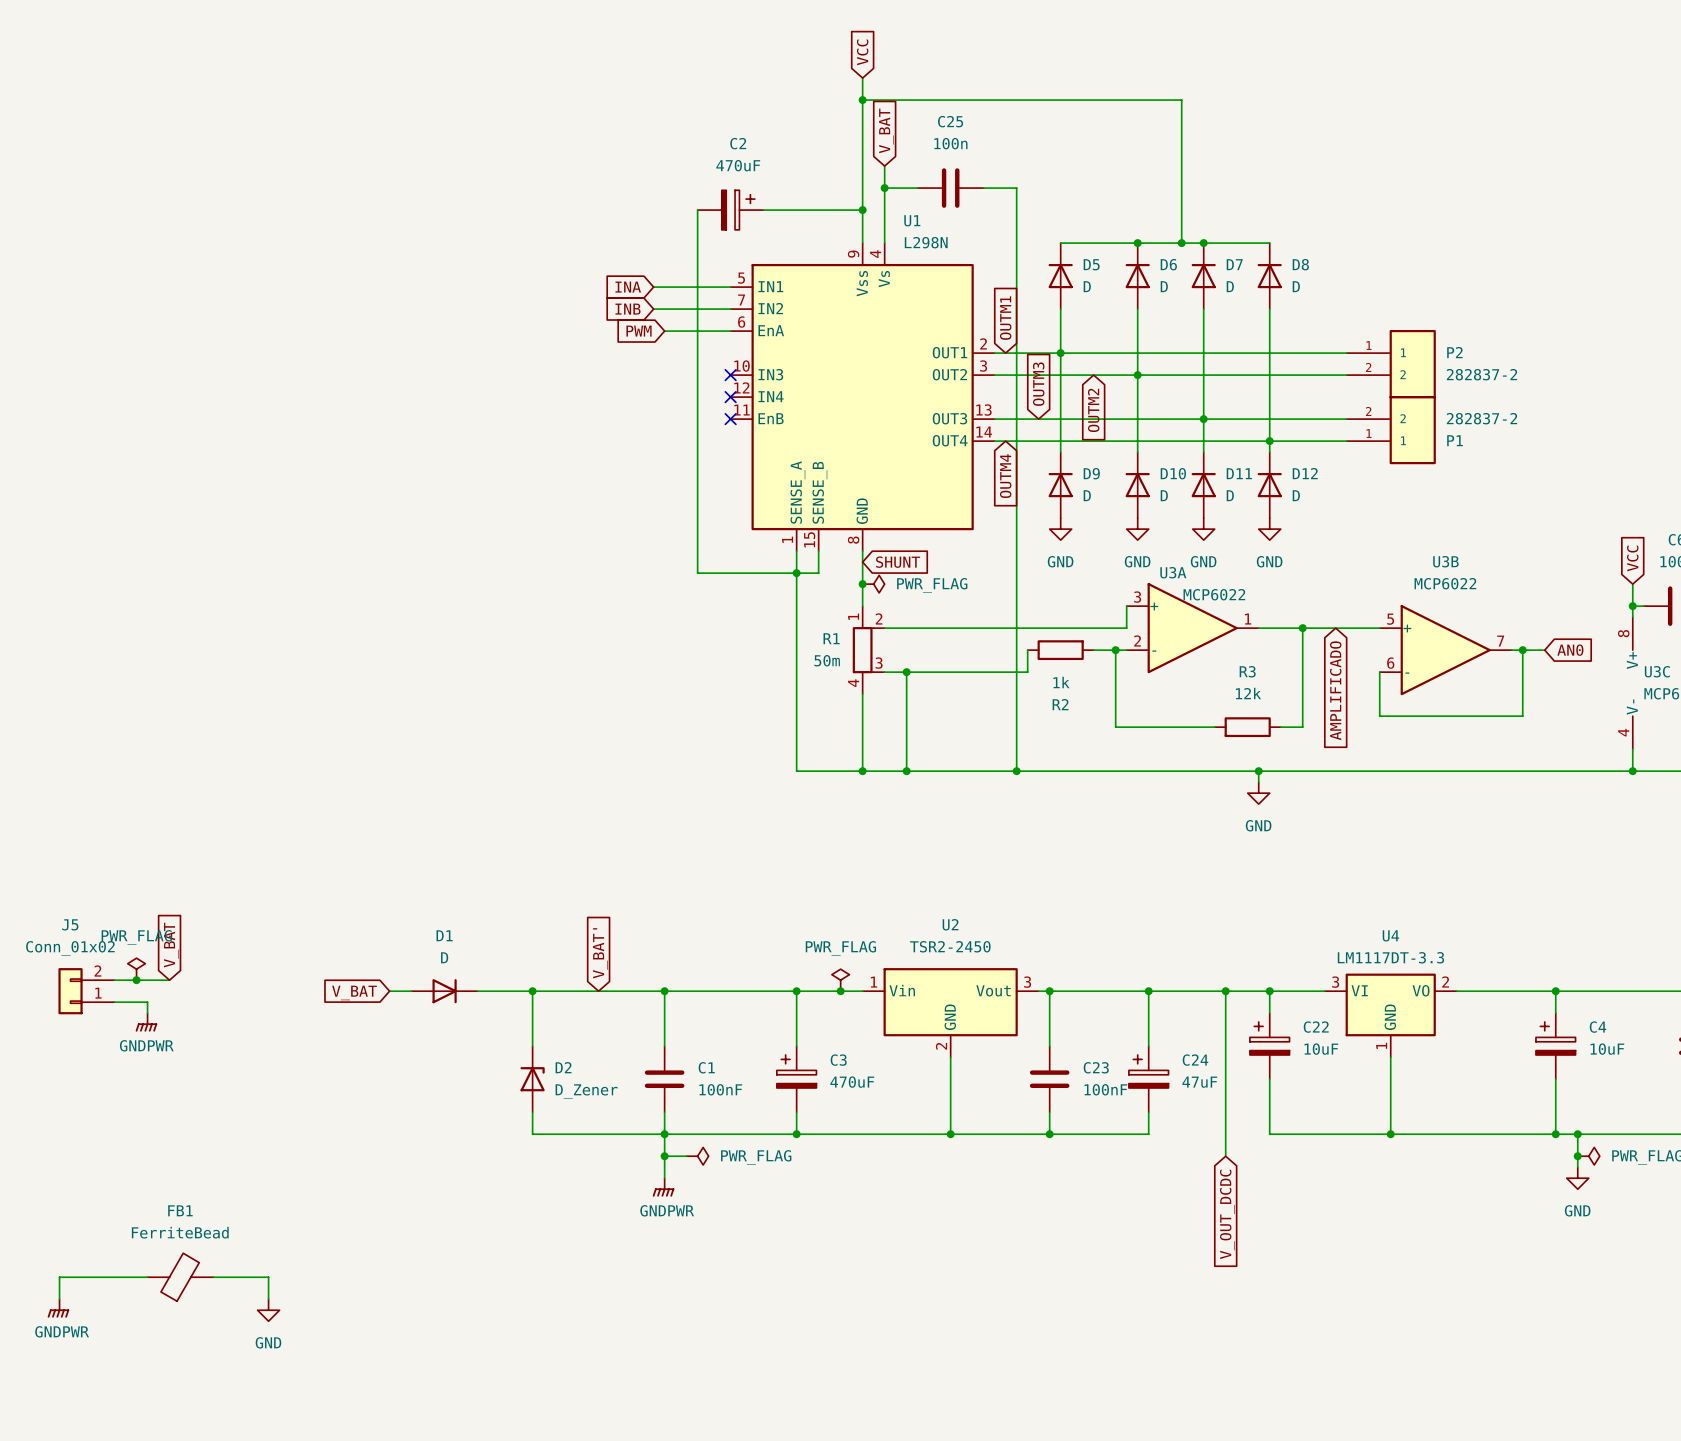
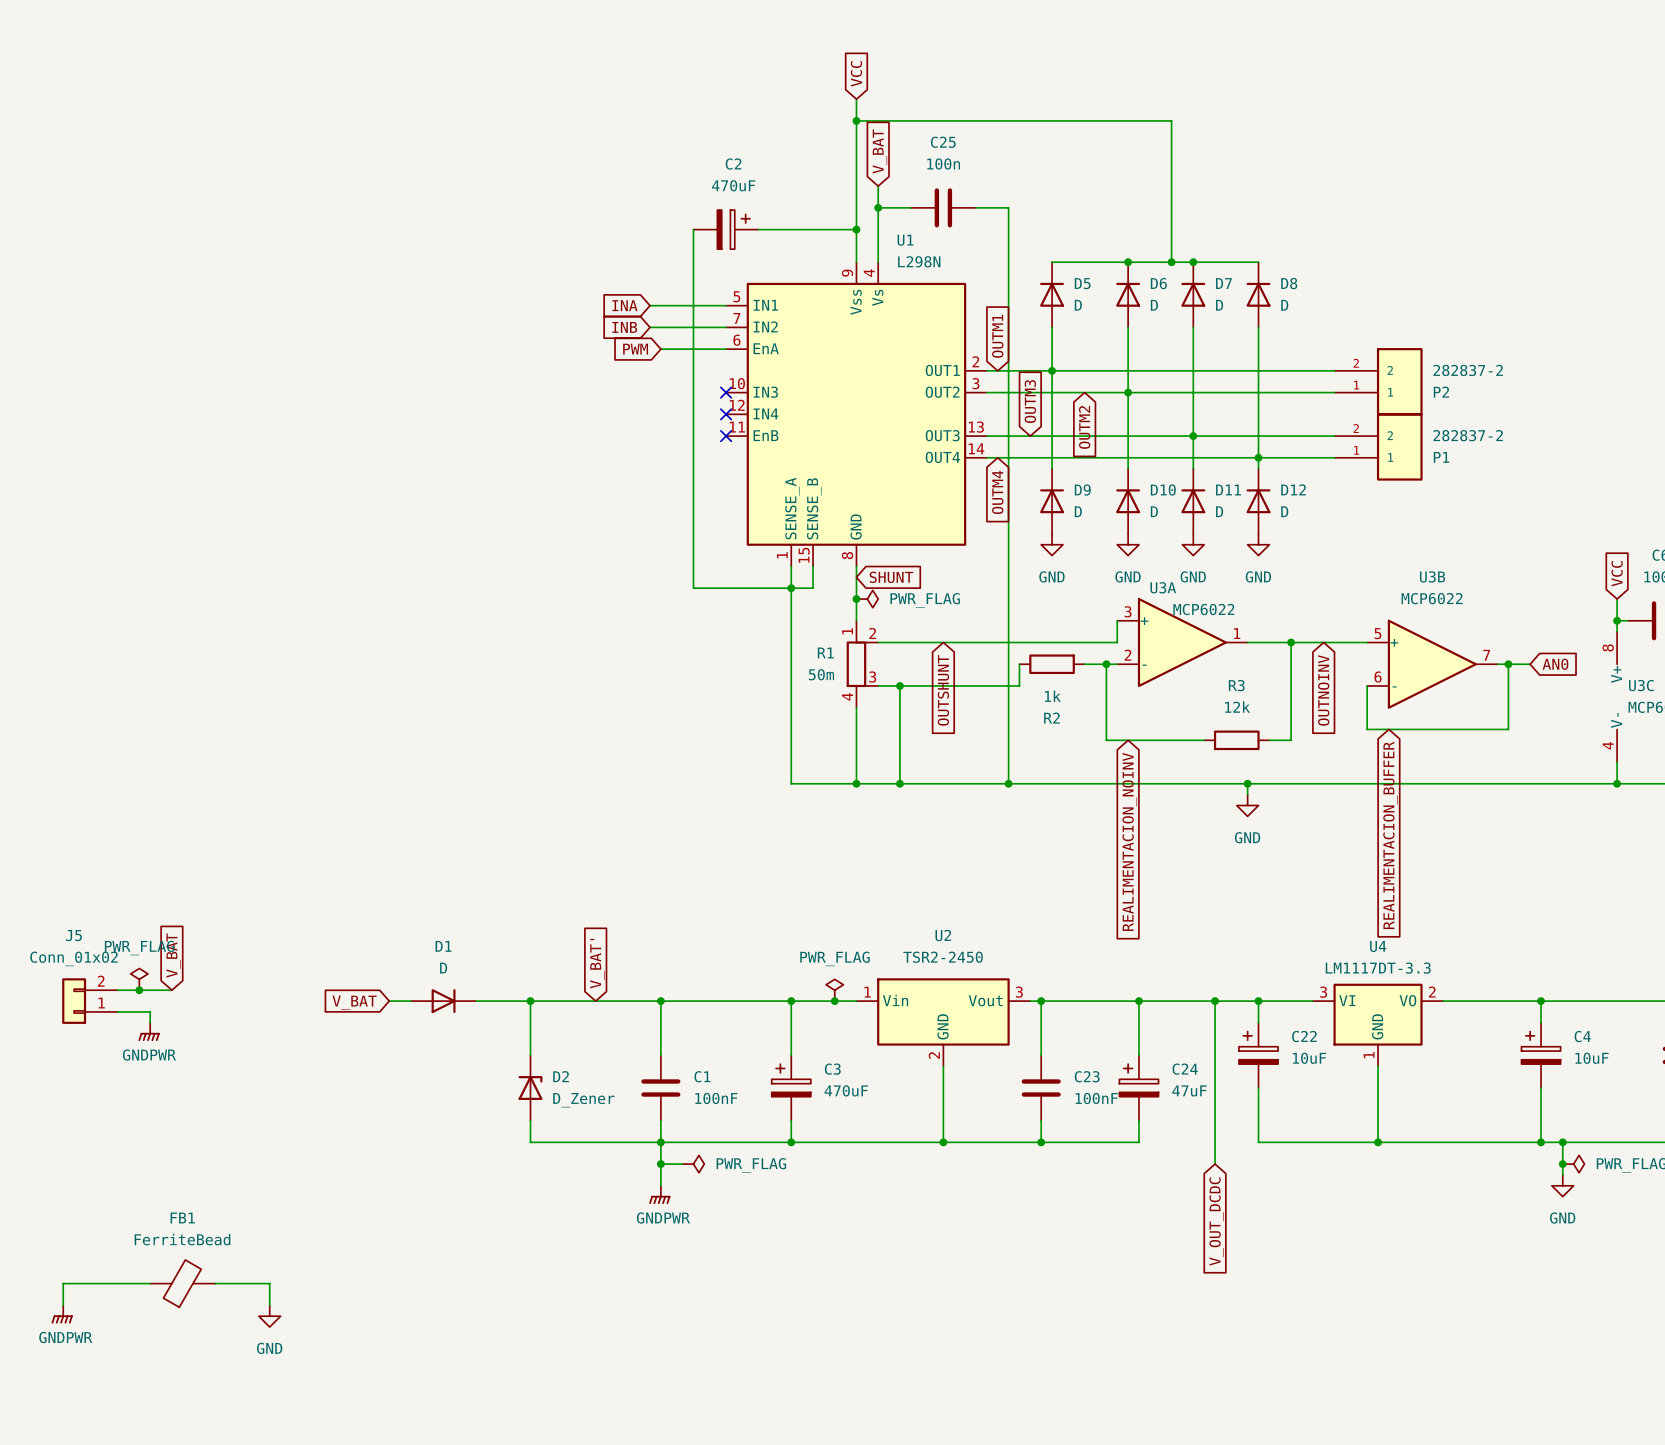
P2 flip: as is (1412, 364) -> up-down (1399, 381)
global label: none -> OUTSHUNT (943, 690)
global label: AMPLIFICADO (1335, 690) -> OUTNOINV (1323, 690)
global label: none -> REALIMENTACION_BUFFER (1390, 835)
global label: none -> REALIMENTACION_NOINV (1129, 841)

